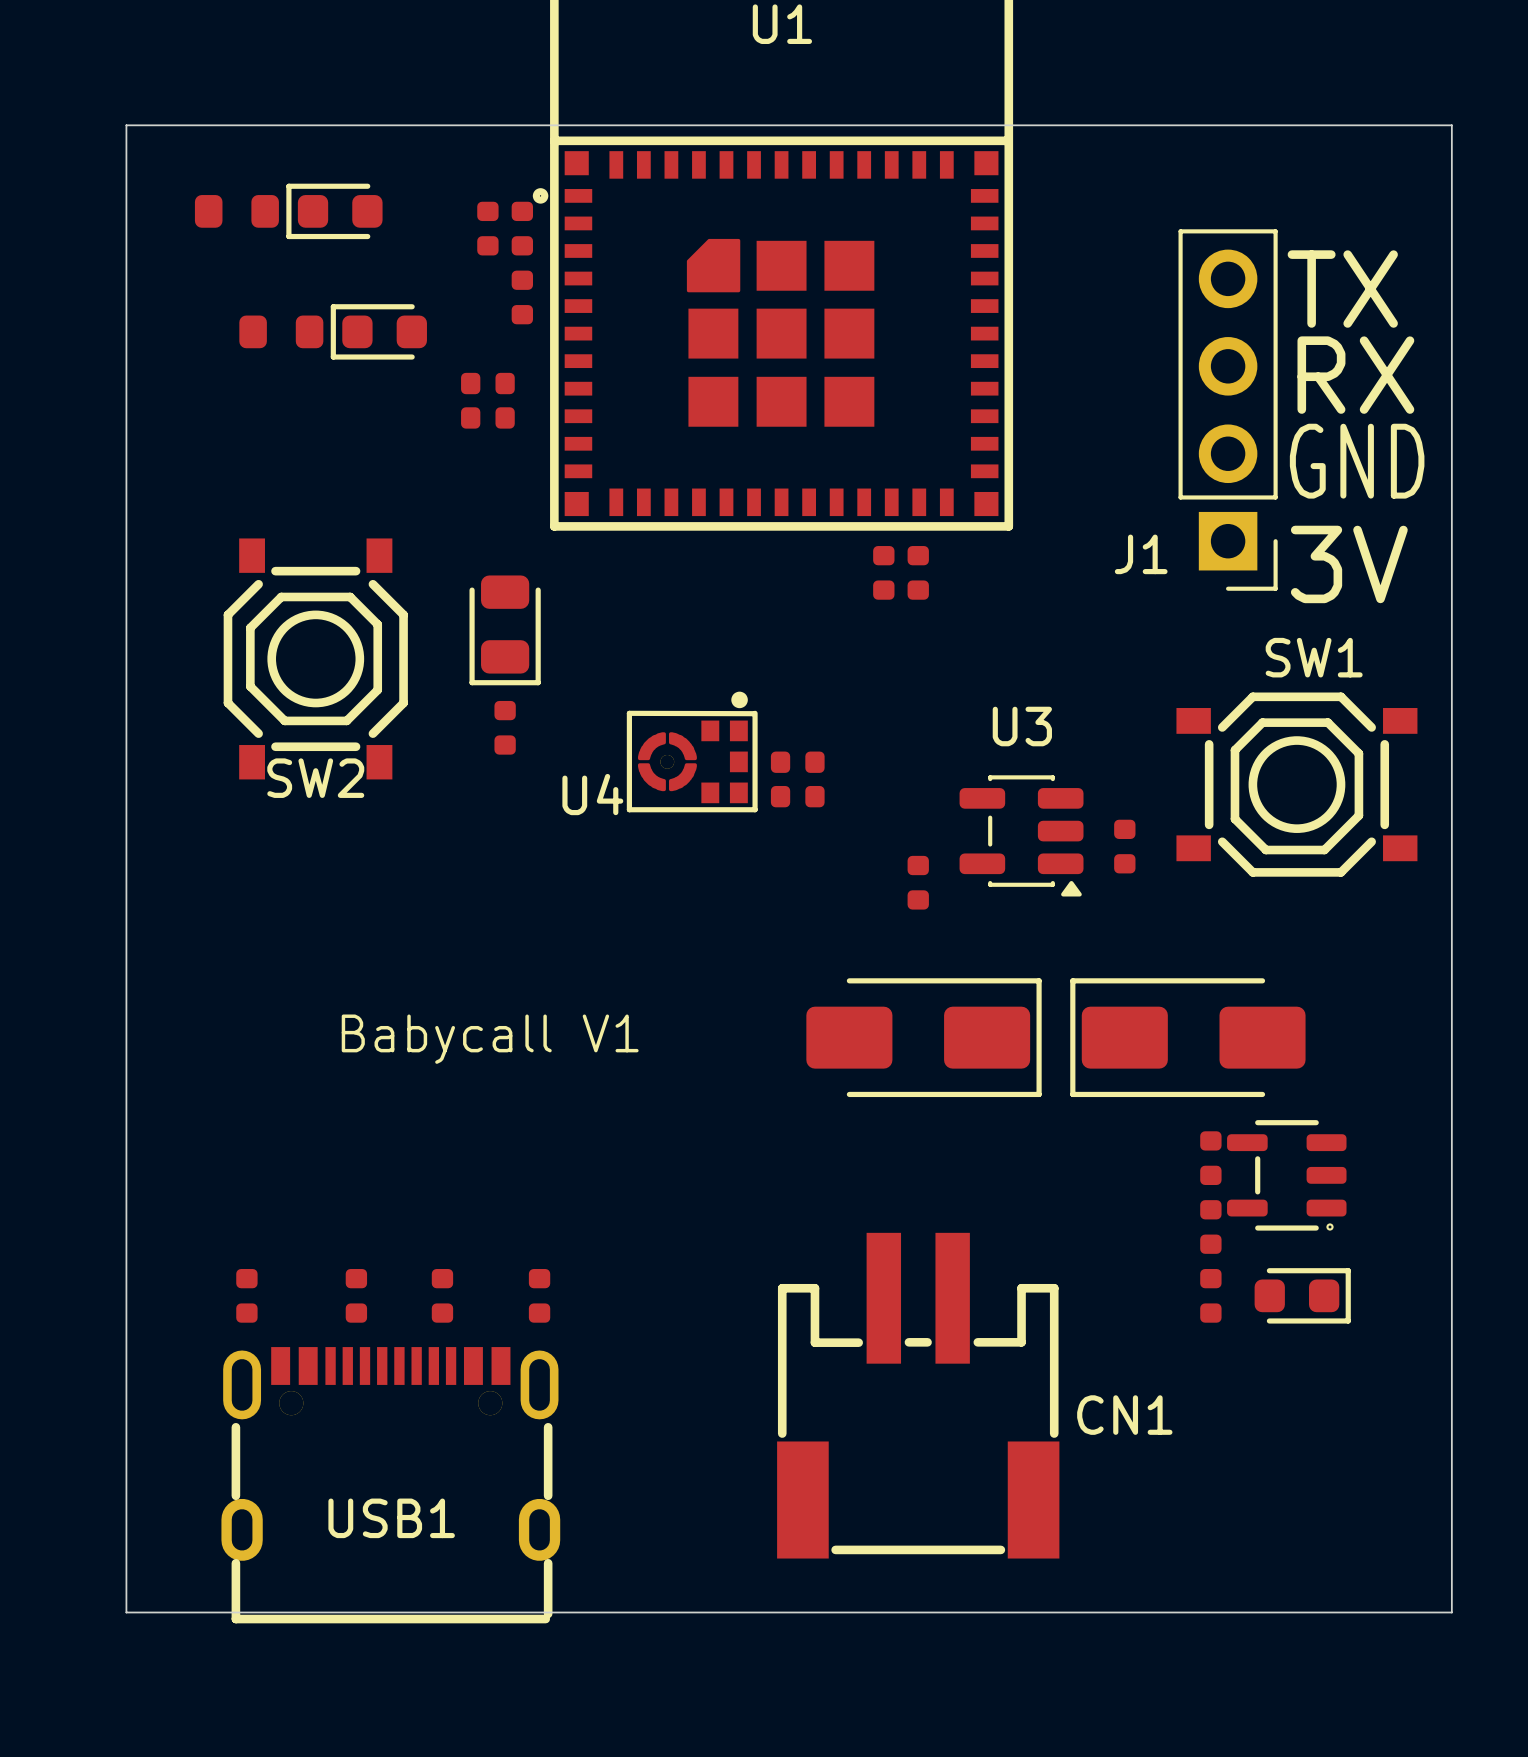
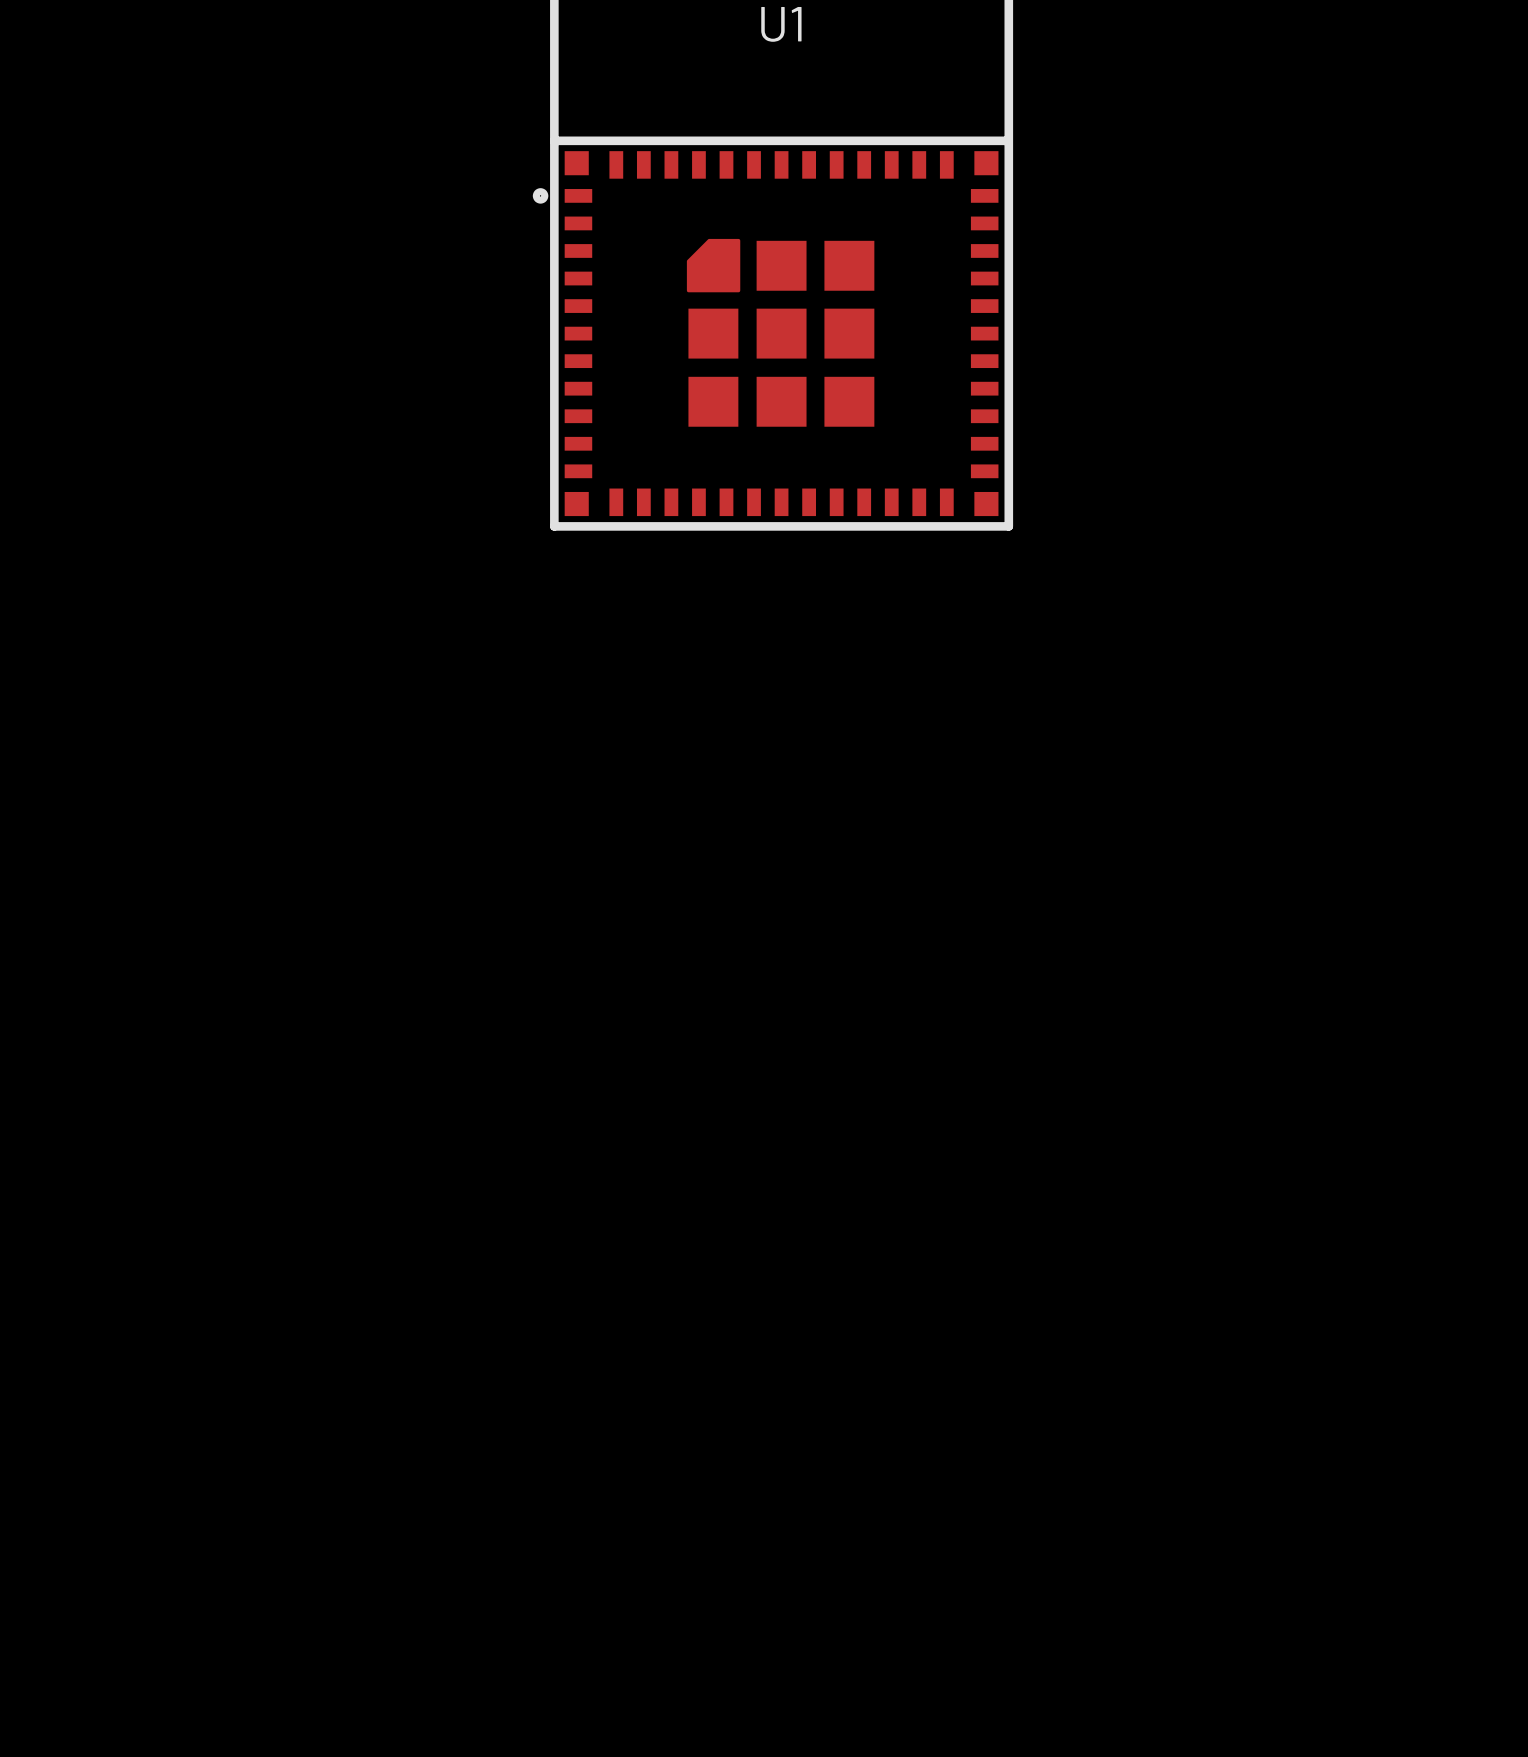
board edge: (126, 125) (1451, 125) (1451, 1612) (126, 1612) (126, 125) -> none
part: (236, 211) -> none
part: (334, 211) -> none
part: (487, 228) -> none
part: (522, 228) -> none
text: TX (1342, 289) -> none
part: (522, 297) -> none
part: (281, 331) -> none
part: (378, 331) -> none
text: RX (1355, 375) -> none
part: (487, 383) -> none
J1: (1228, 410) -> none
part: (487, 417) -> none
text: GND (1357, 461) -> none
text: 3V (1349, 564) -> none
part: (883, 572) -> none
part: (918, 572) -> none
part: (505, 630) -> none
SW2: (315, 658) -> none
part: (505, 727) -> none
U4: (692, 751) -> none
part: (797, 762) -> none
SW1: (1296, 784) -> none
part: (797, 796) -> none
U3: (1021, 835) -> none
part: (1124, 846) -> none
part: (918, 882) -> none
part: (924, 1037) -> none
part: (1187, 1037) -> none
text: Babycall V1 (490, 1039) -> none
part: (1210, 1158) -> none
part: (1286, 1175) -> none
part: (1210, 1226) -> none
part: (246, 1295) -> none
part: (356, 1295) -> none
part: (442, 1295) -> none
part: (539, 1295) -> none
part: (1210, 1295) -> none
part: (1302, 1295) -> none
CN1: (918, 1395) -> none
USB1: (390, 1485) -> none

